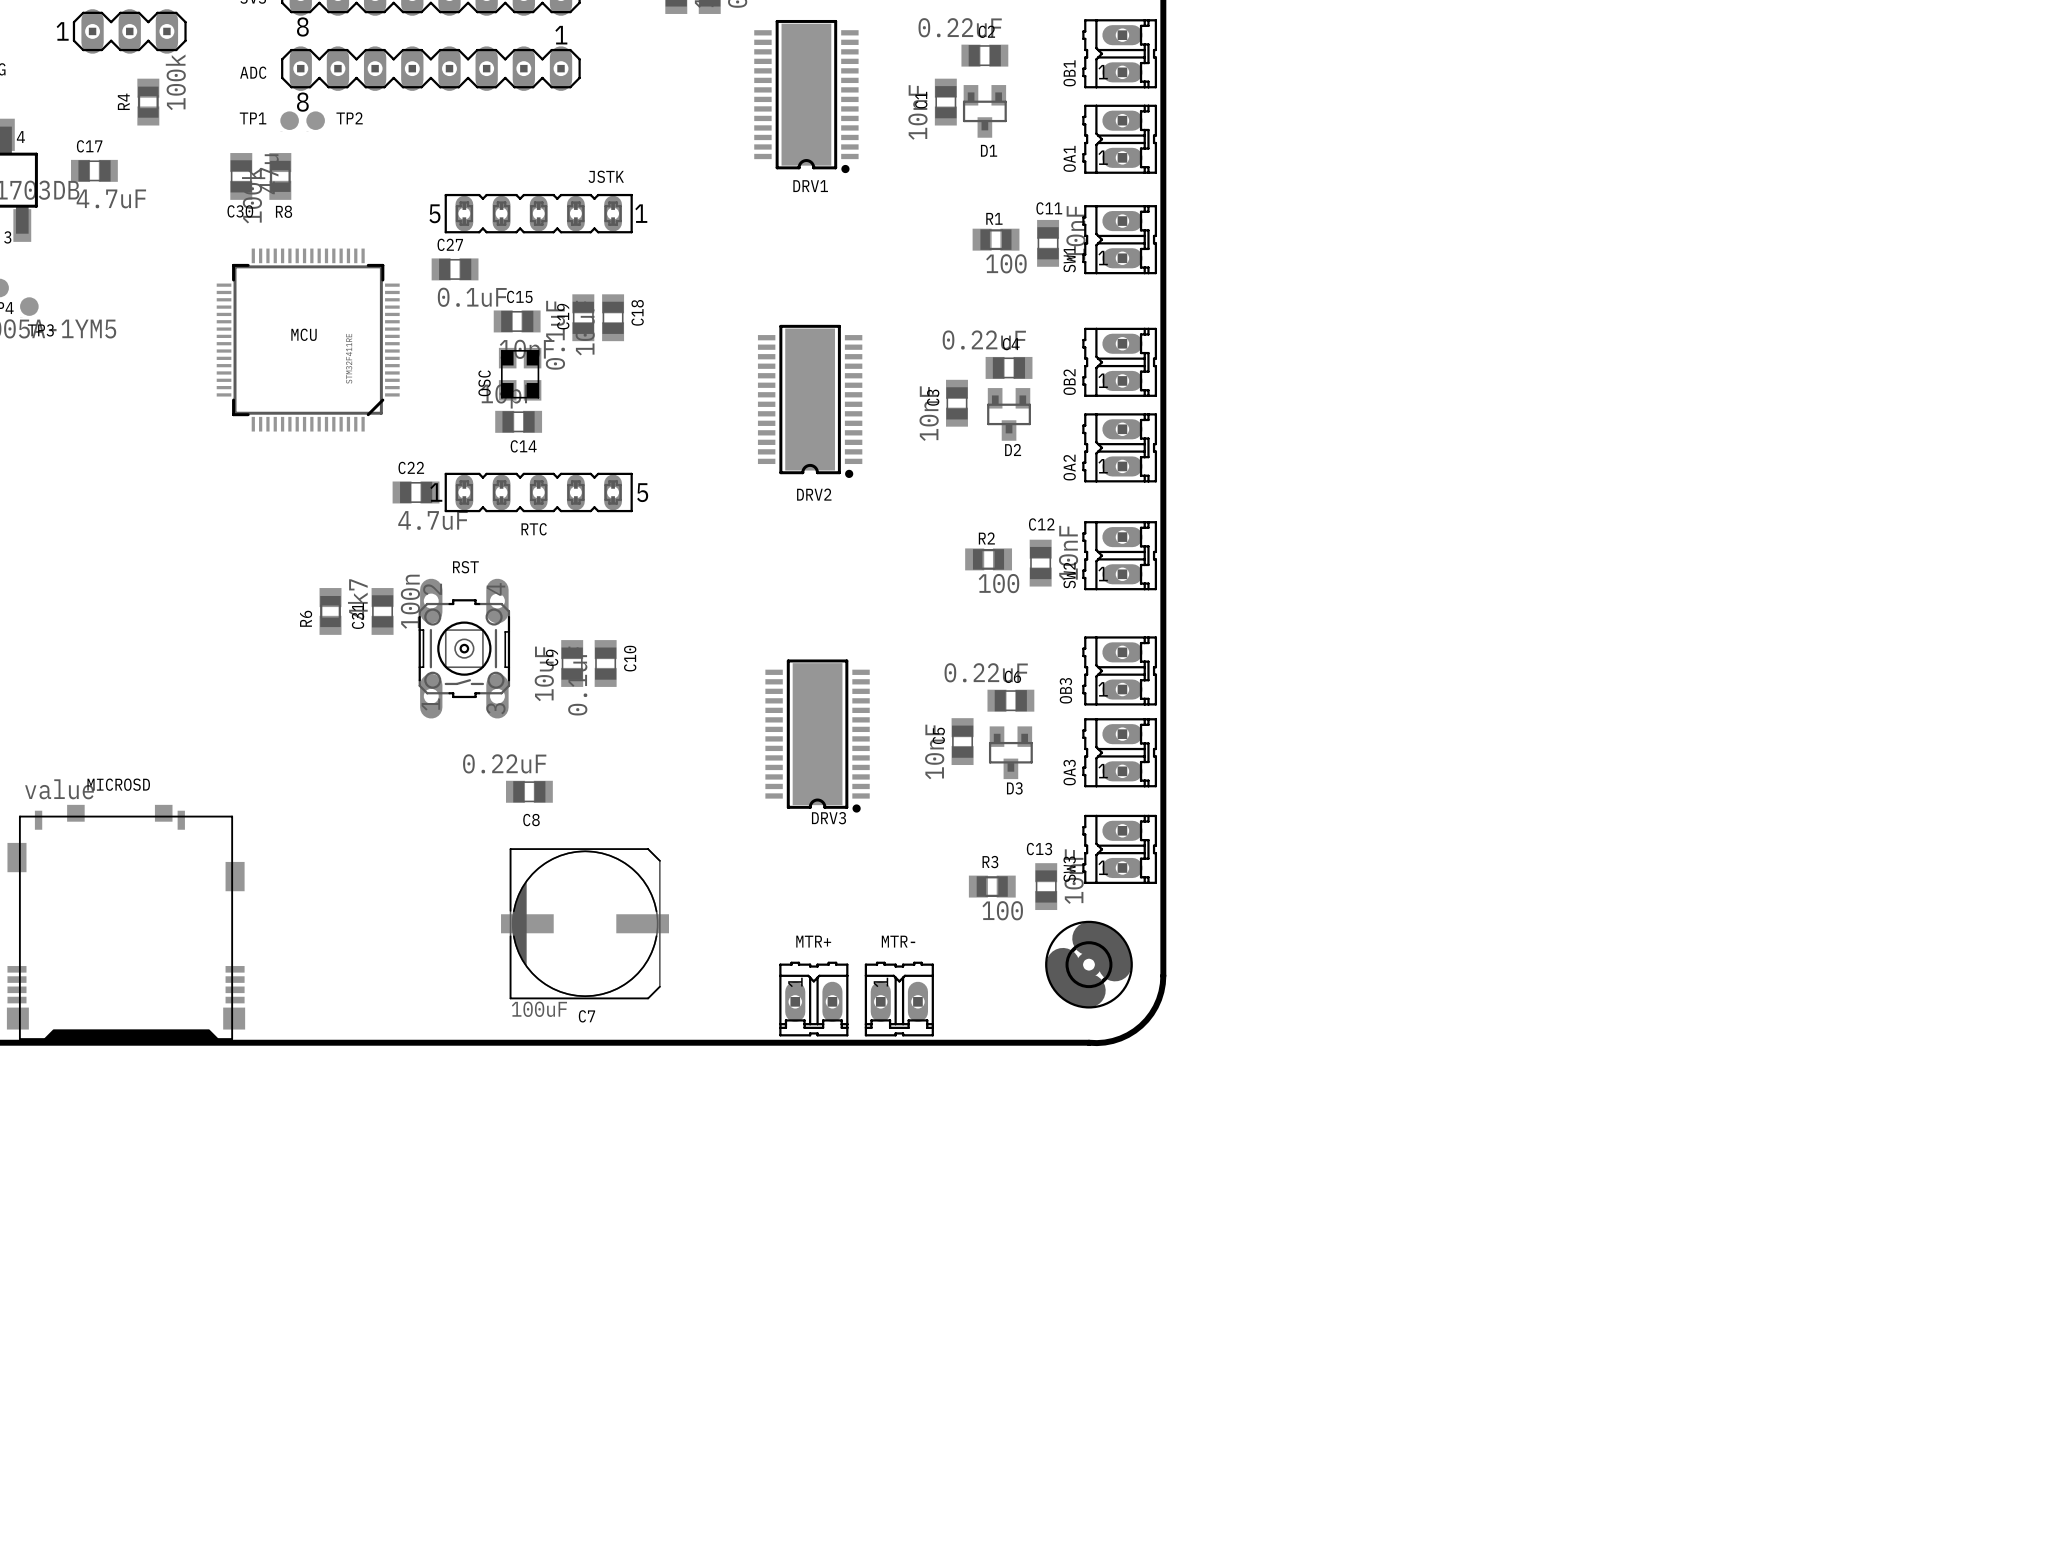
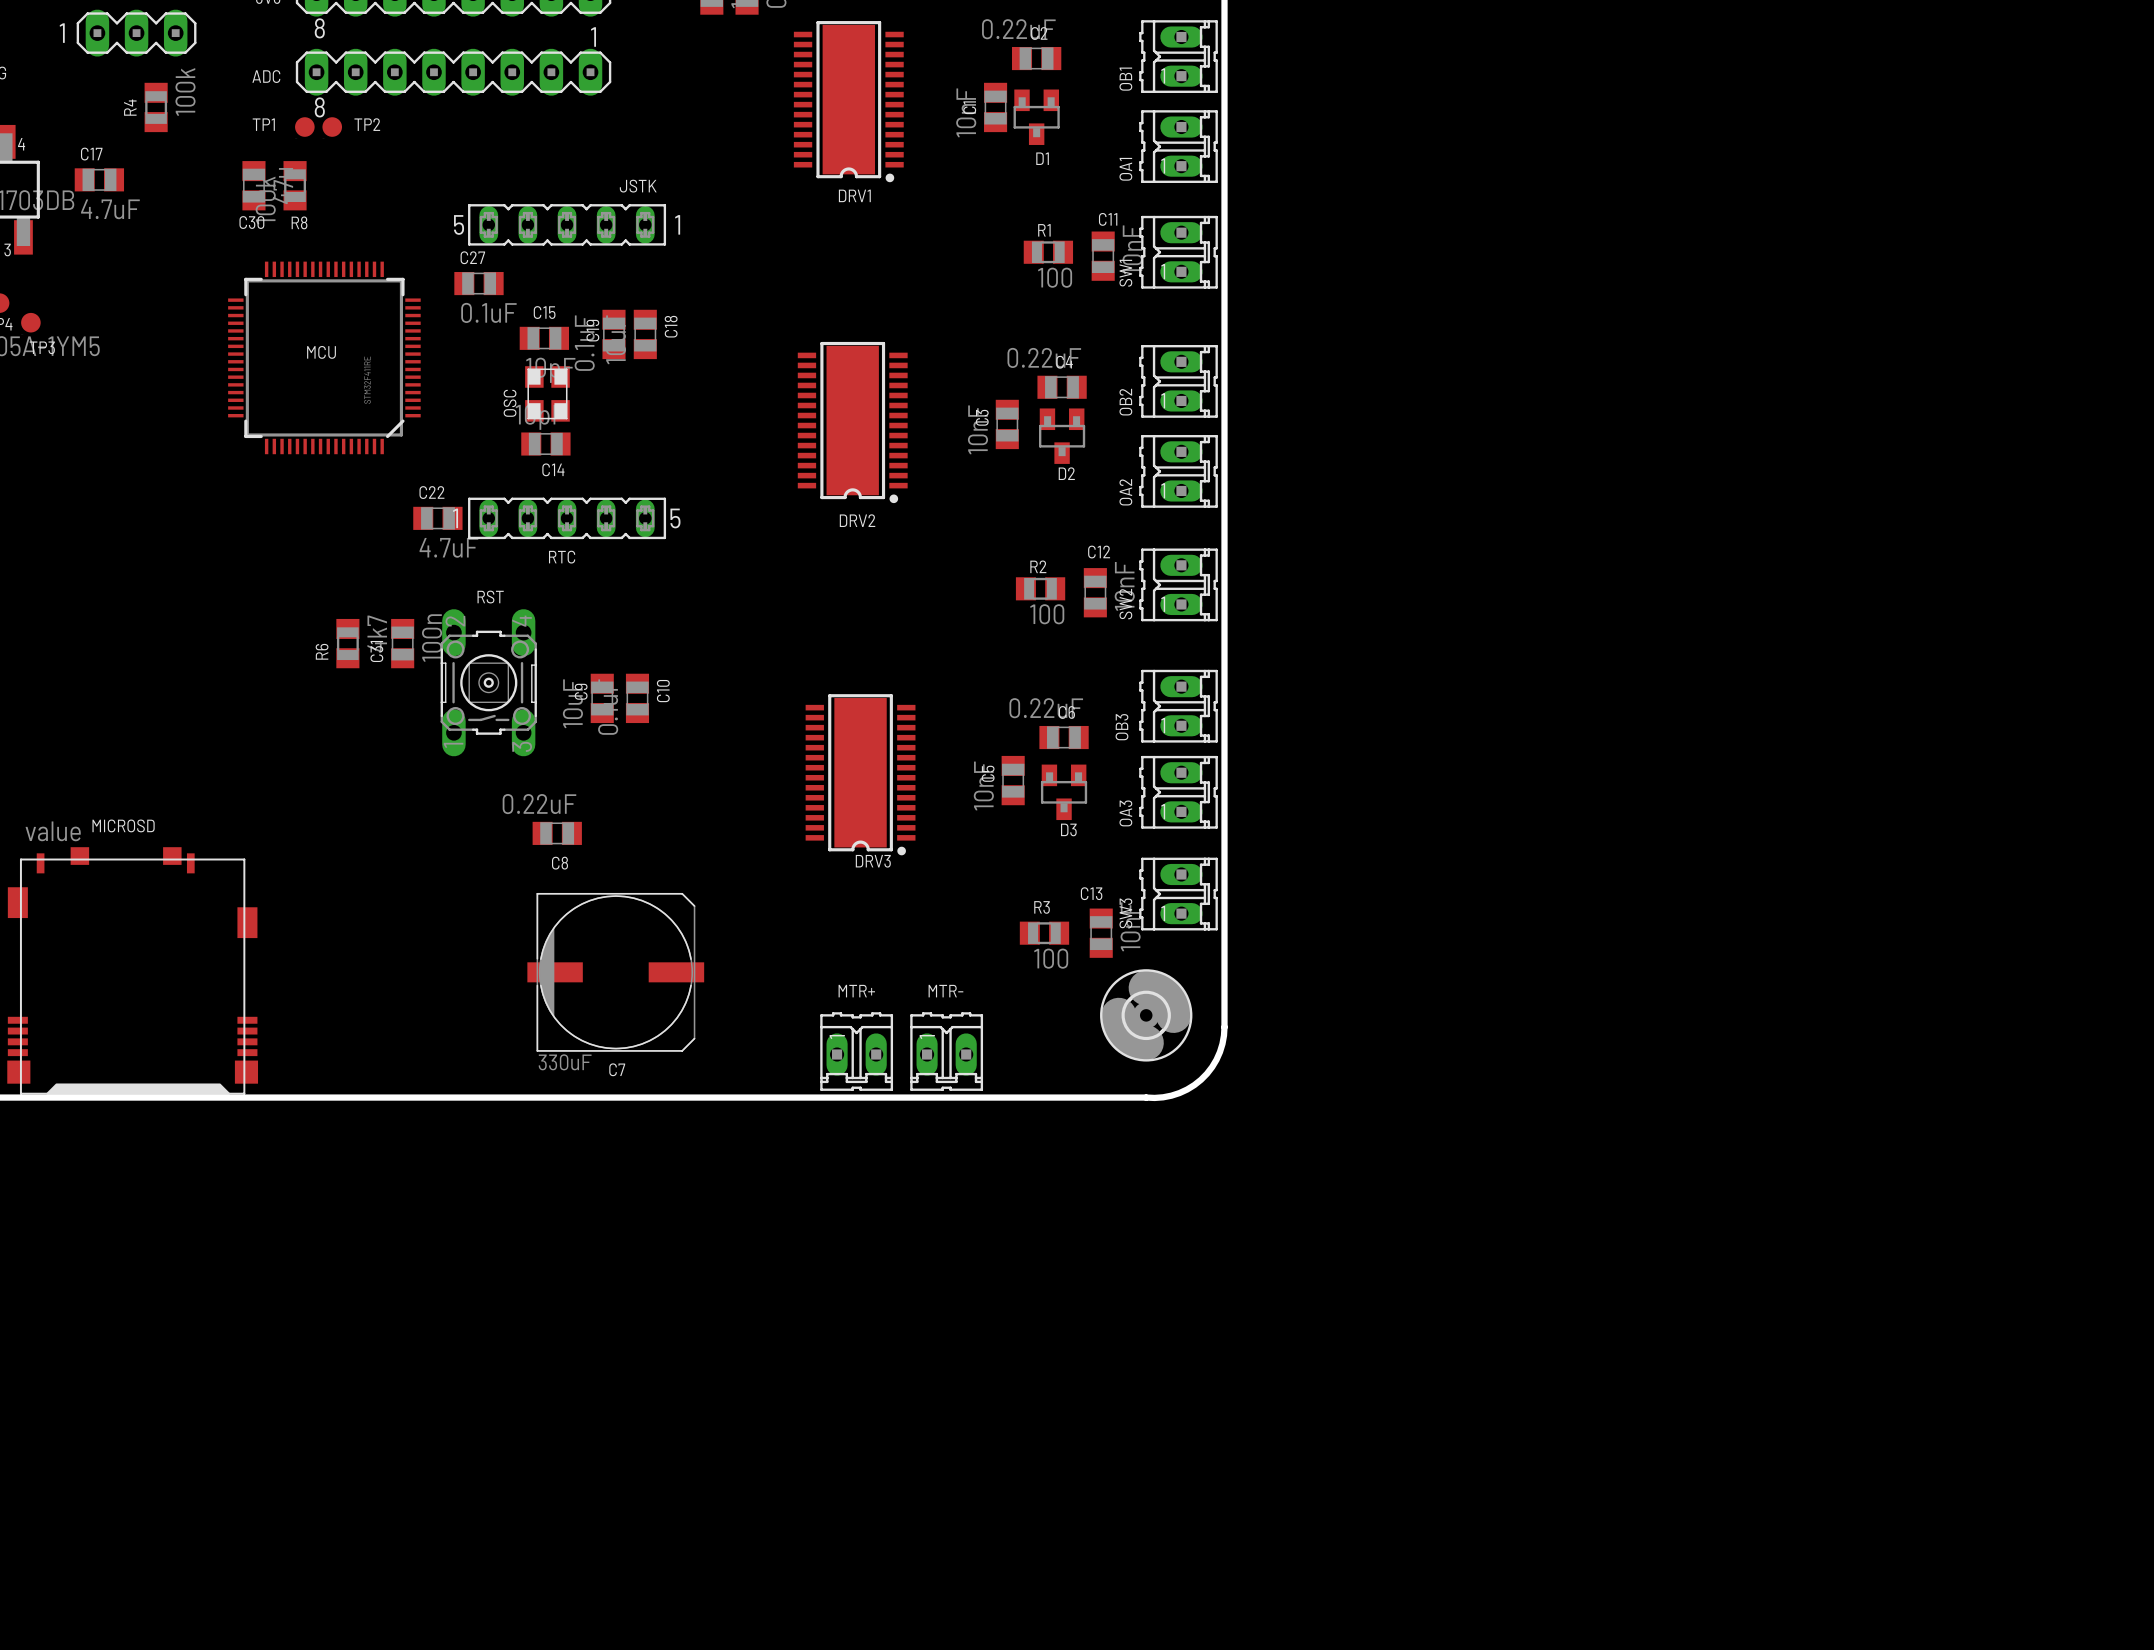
C7 value: 100uF (539, 1009) -> 330uF (565, 1062)

